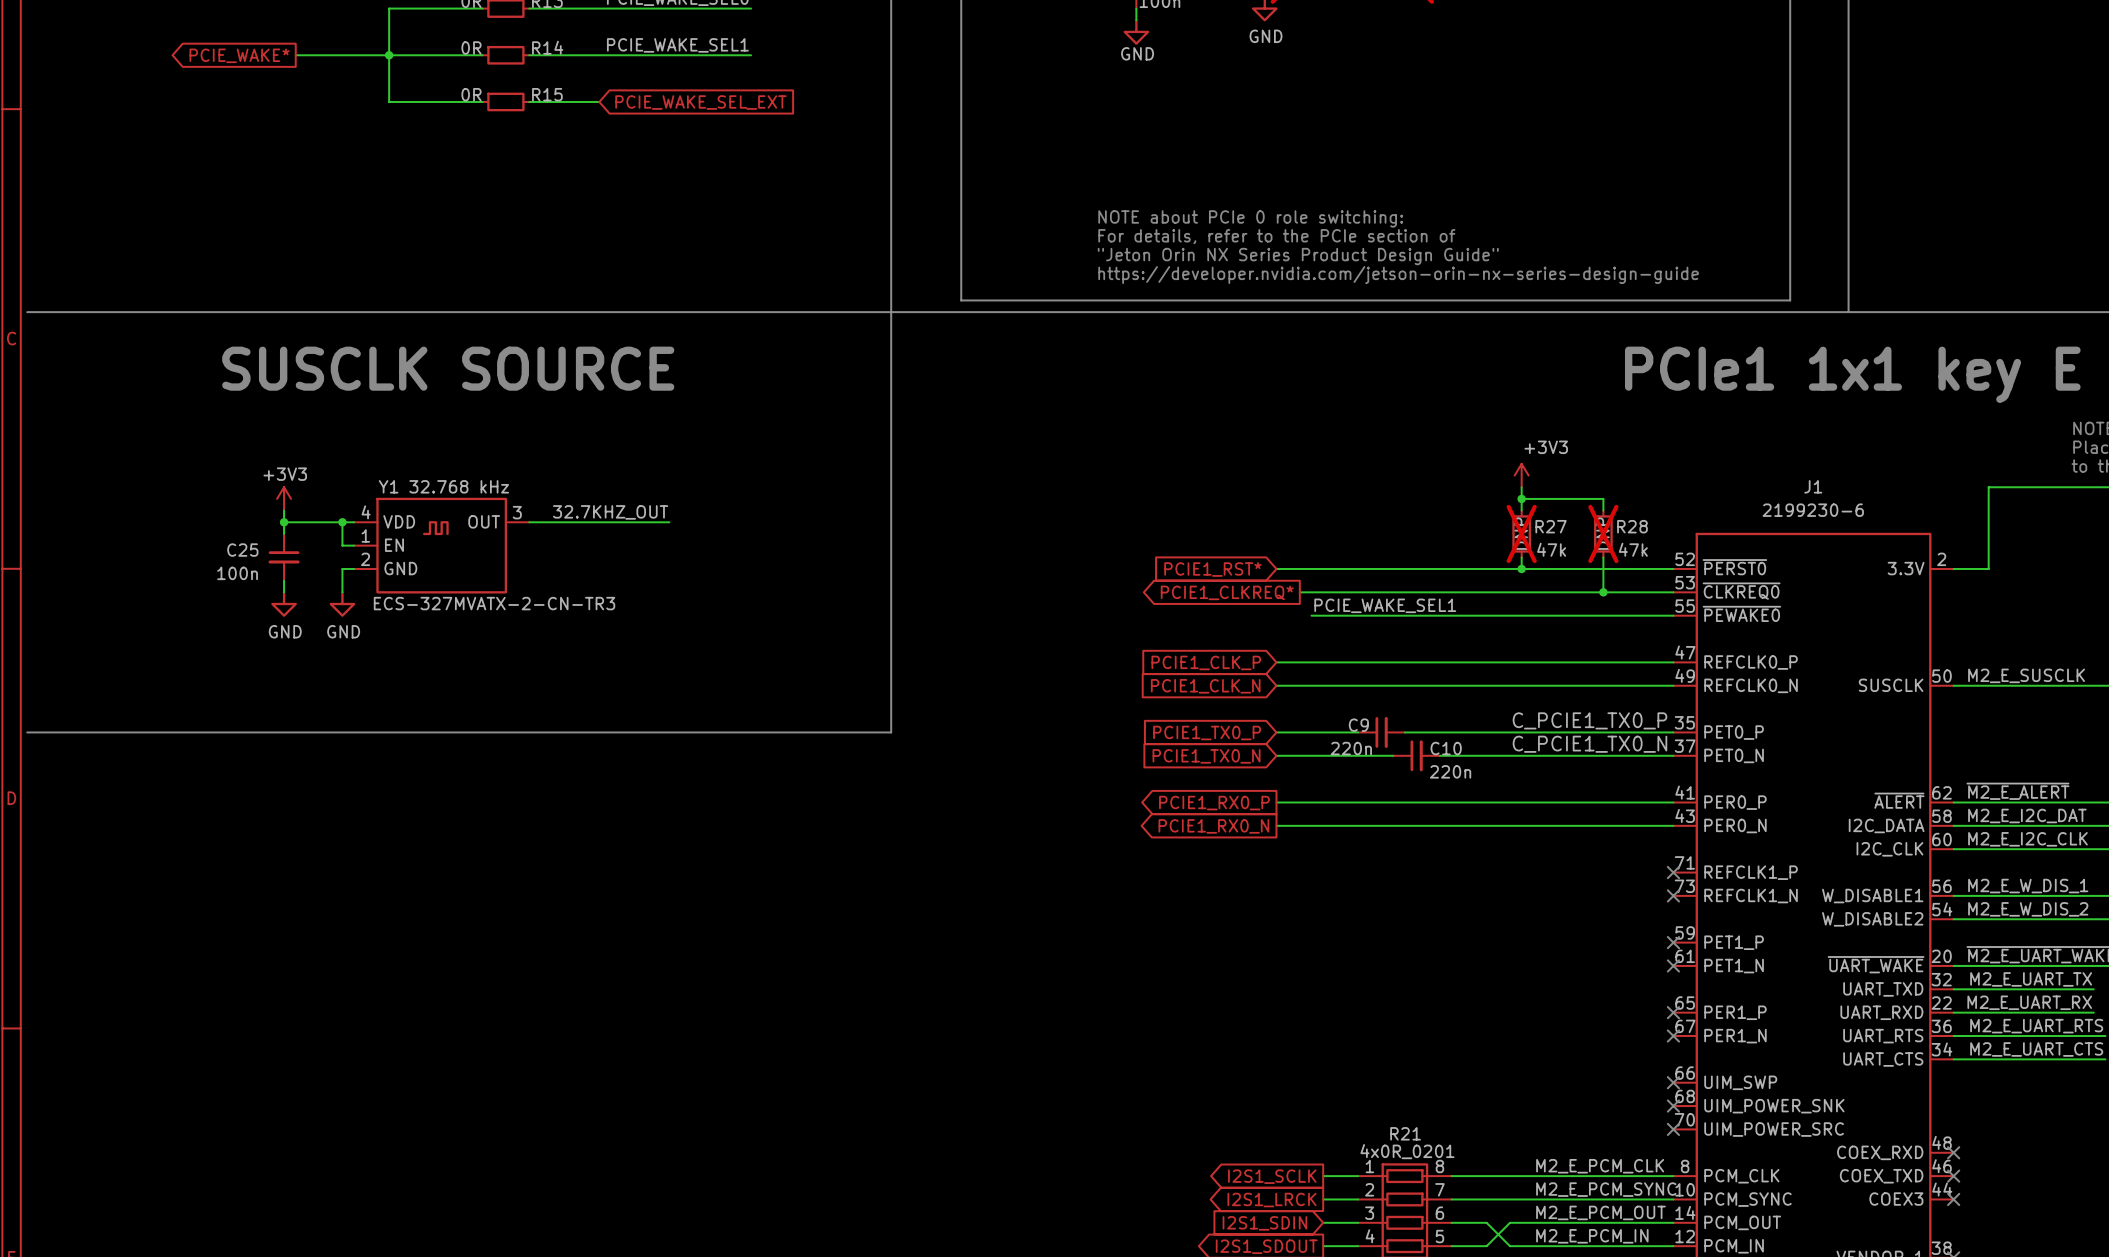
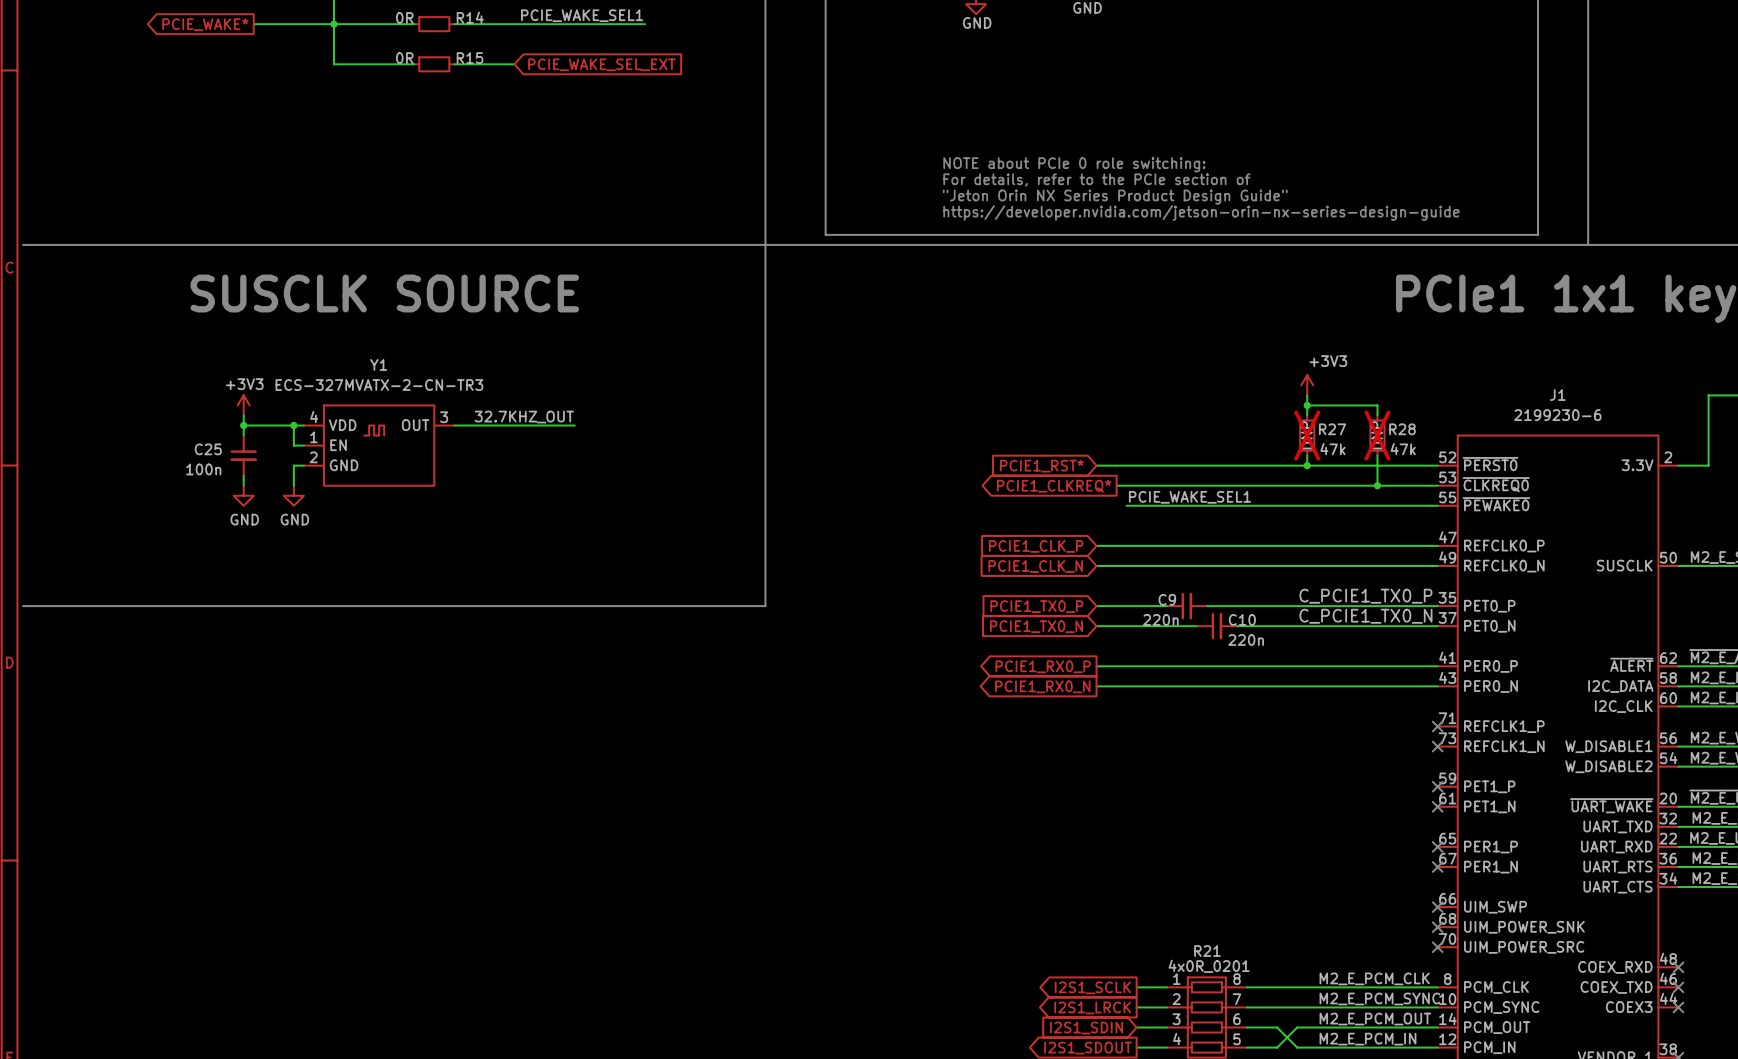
Y1 name position: Y1 (388, 486) -> Y1 (378, 364)
Y1 text: 32.768 kHz (459, 486) -> none
Y1 text position: ECS-327MVATX-2-CN-TR3 (494, 603) -> ECS-327MVATX-2-CN-TR3 (379, 385)

